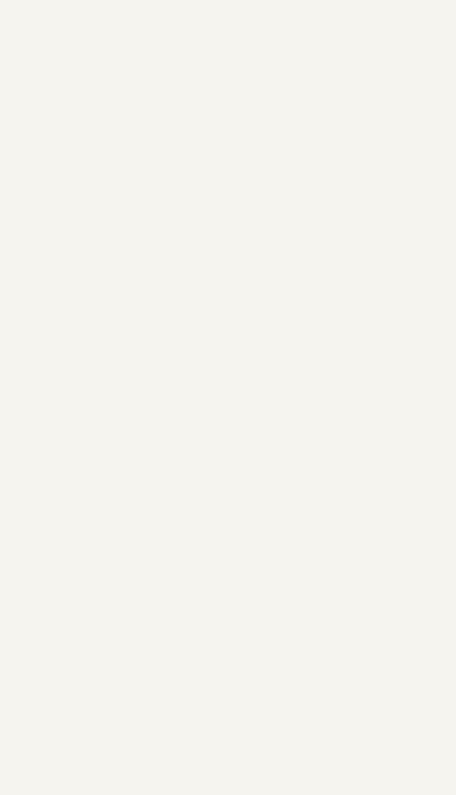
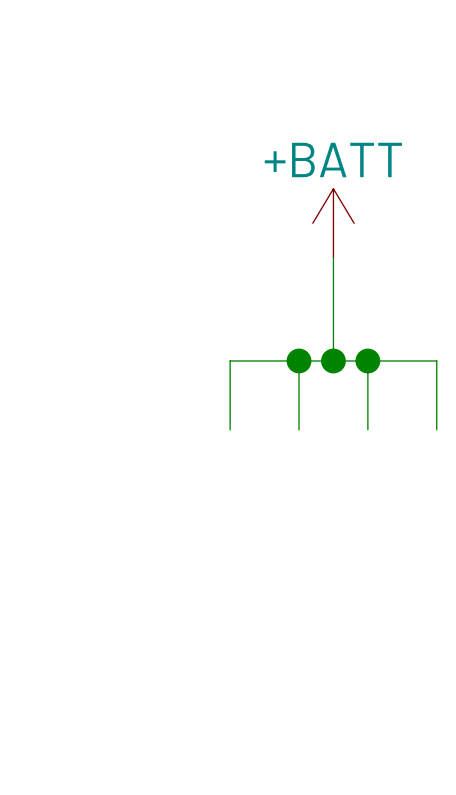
power symbol: none -> +BATT (333, 223)
wire: none -> (333, 257) (333, 360)
wire: none -> (299, 360) (299, 429)
junction: none -> (299, 360)
junction: none -> (333, 360)
wire: none -> (367, 360) (367, 429)
junction: none -> (367, 360)
wire: none -> (230, 429) (230, 360) (436, 360) (436, 429)

